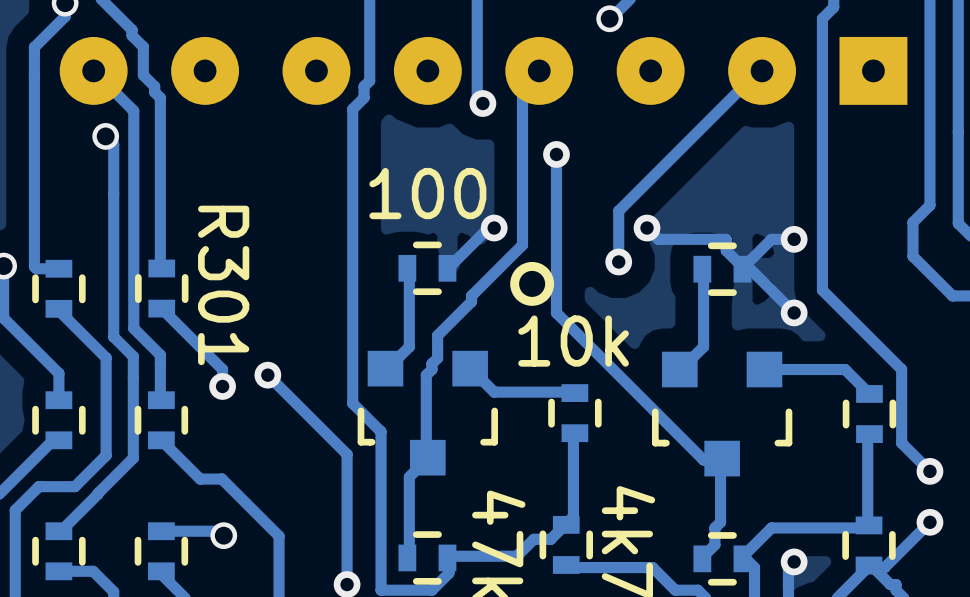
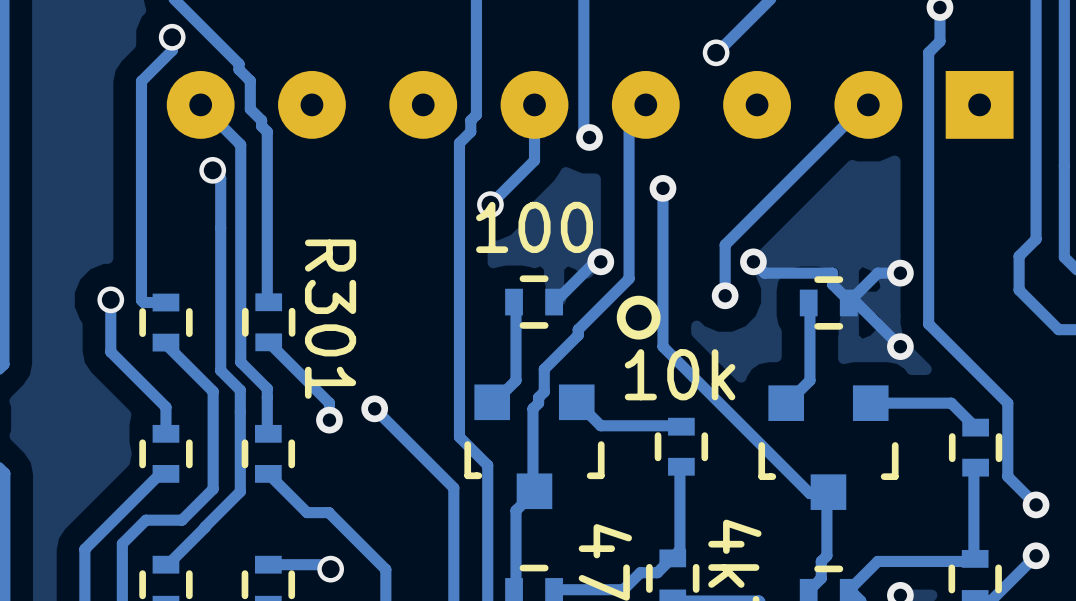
track: none -> (534, 104) (534, 160) (490, 204)
via: none -> (490, 204)

